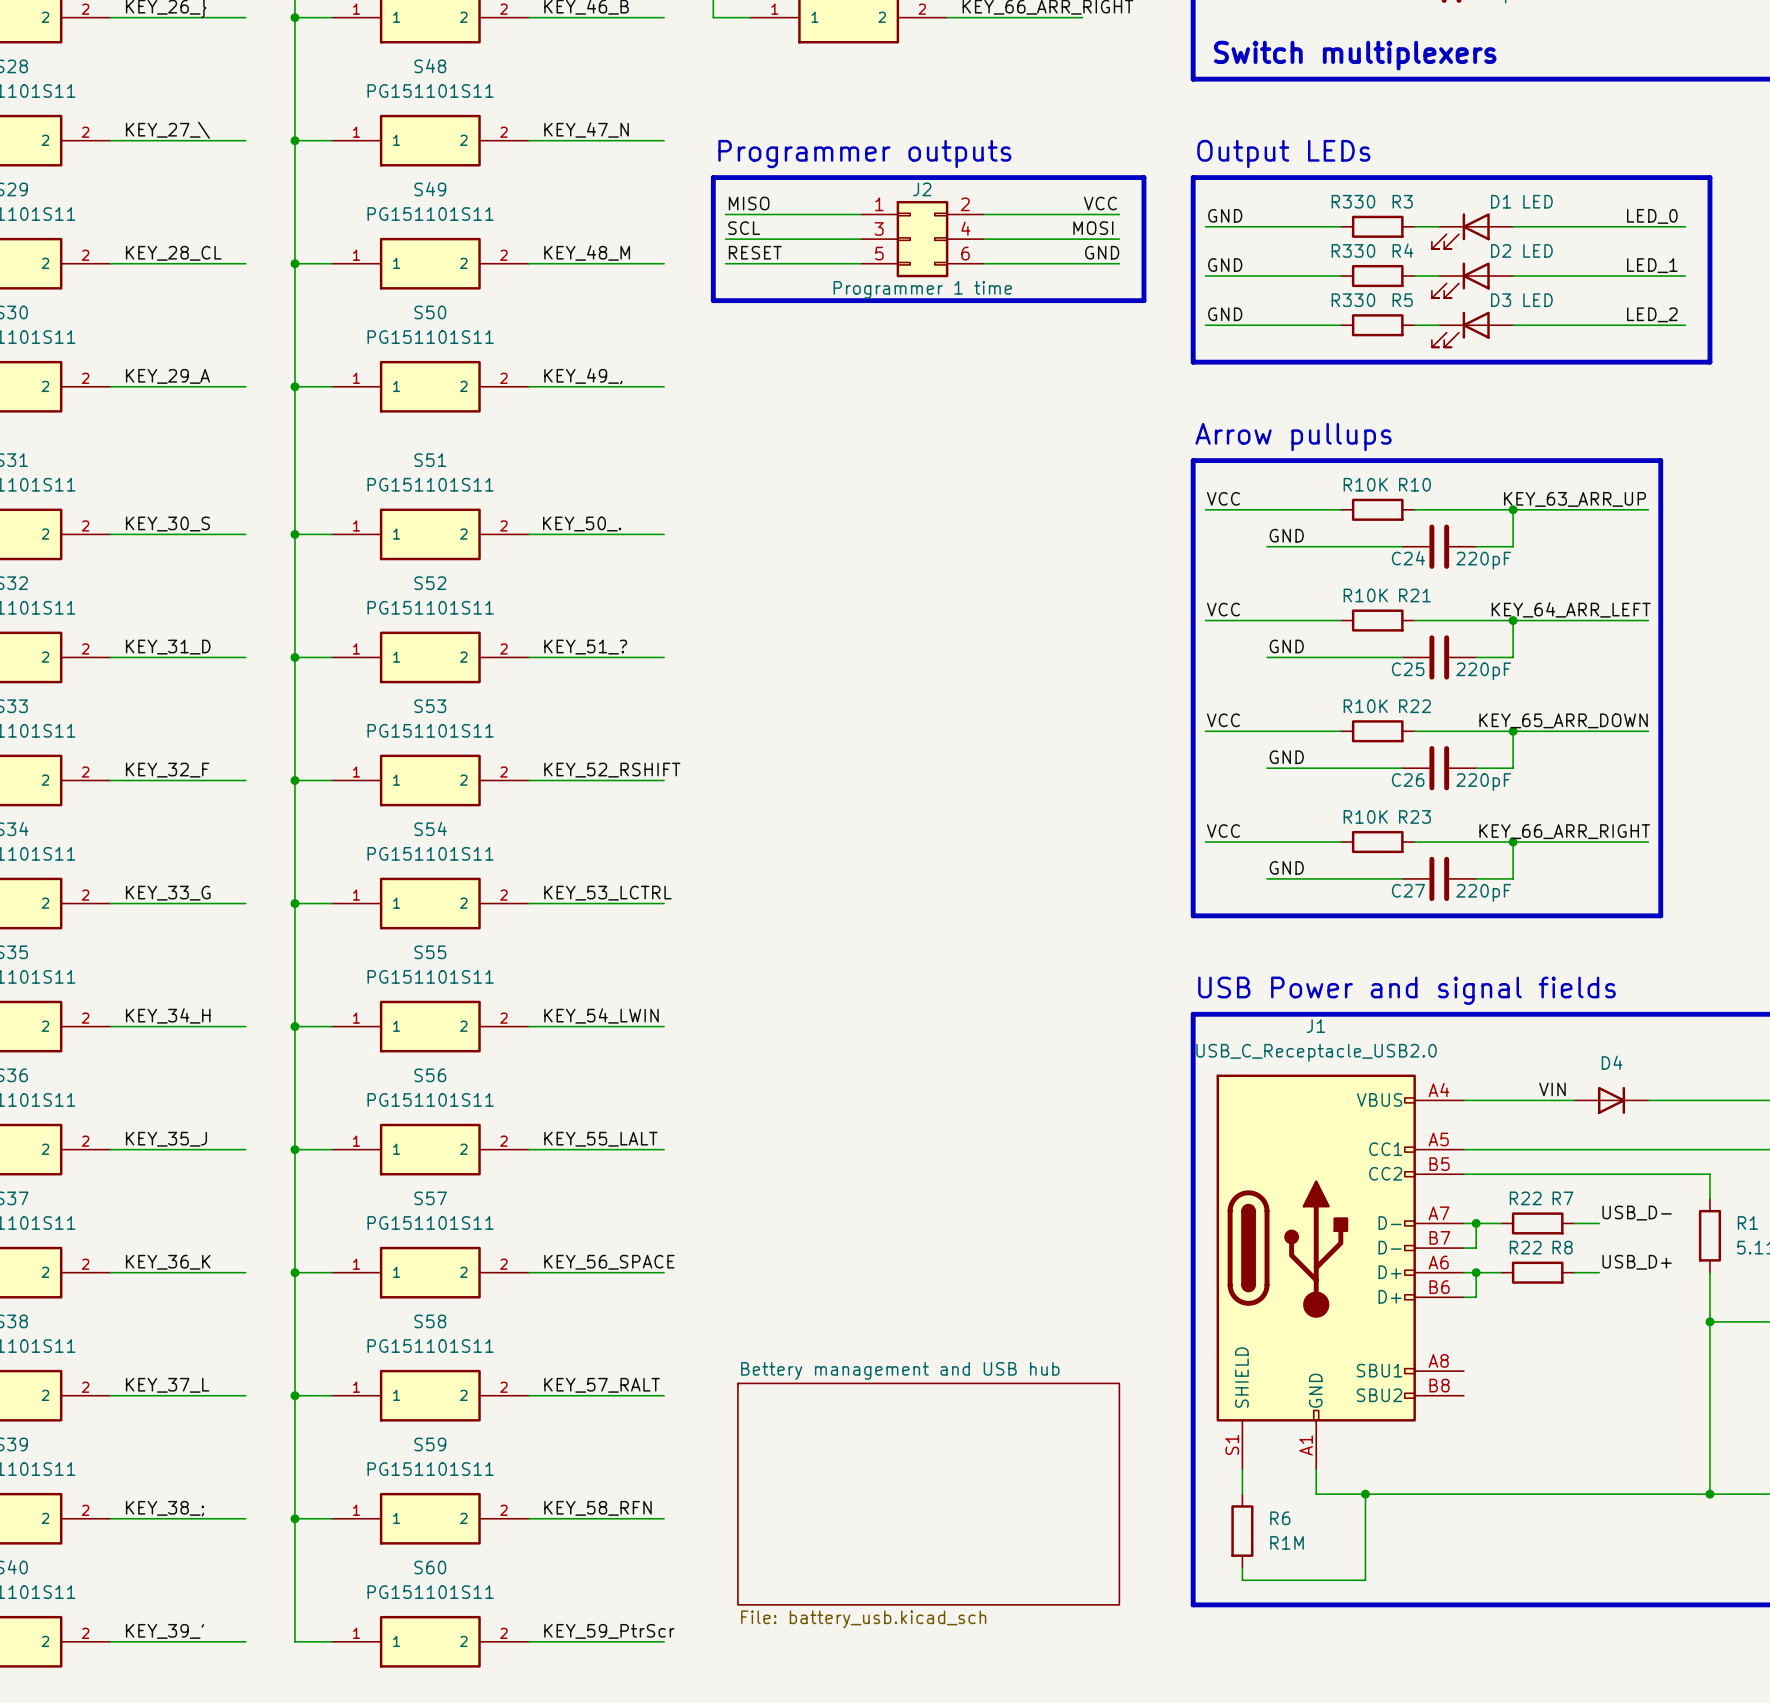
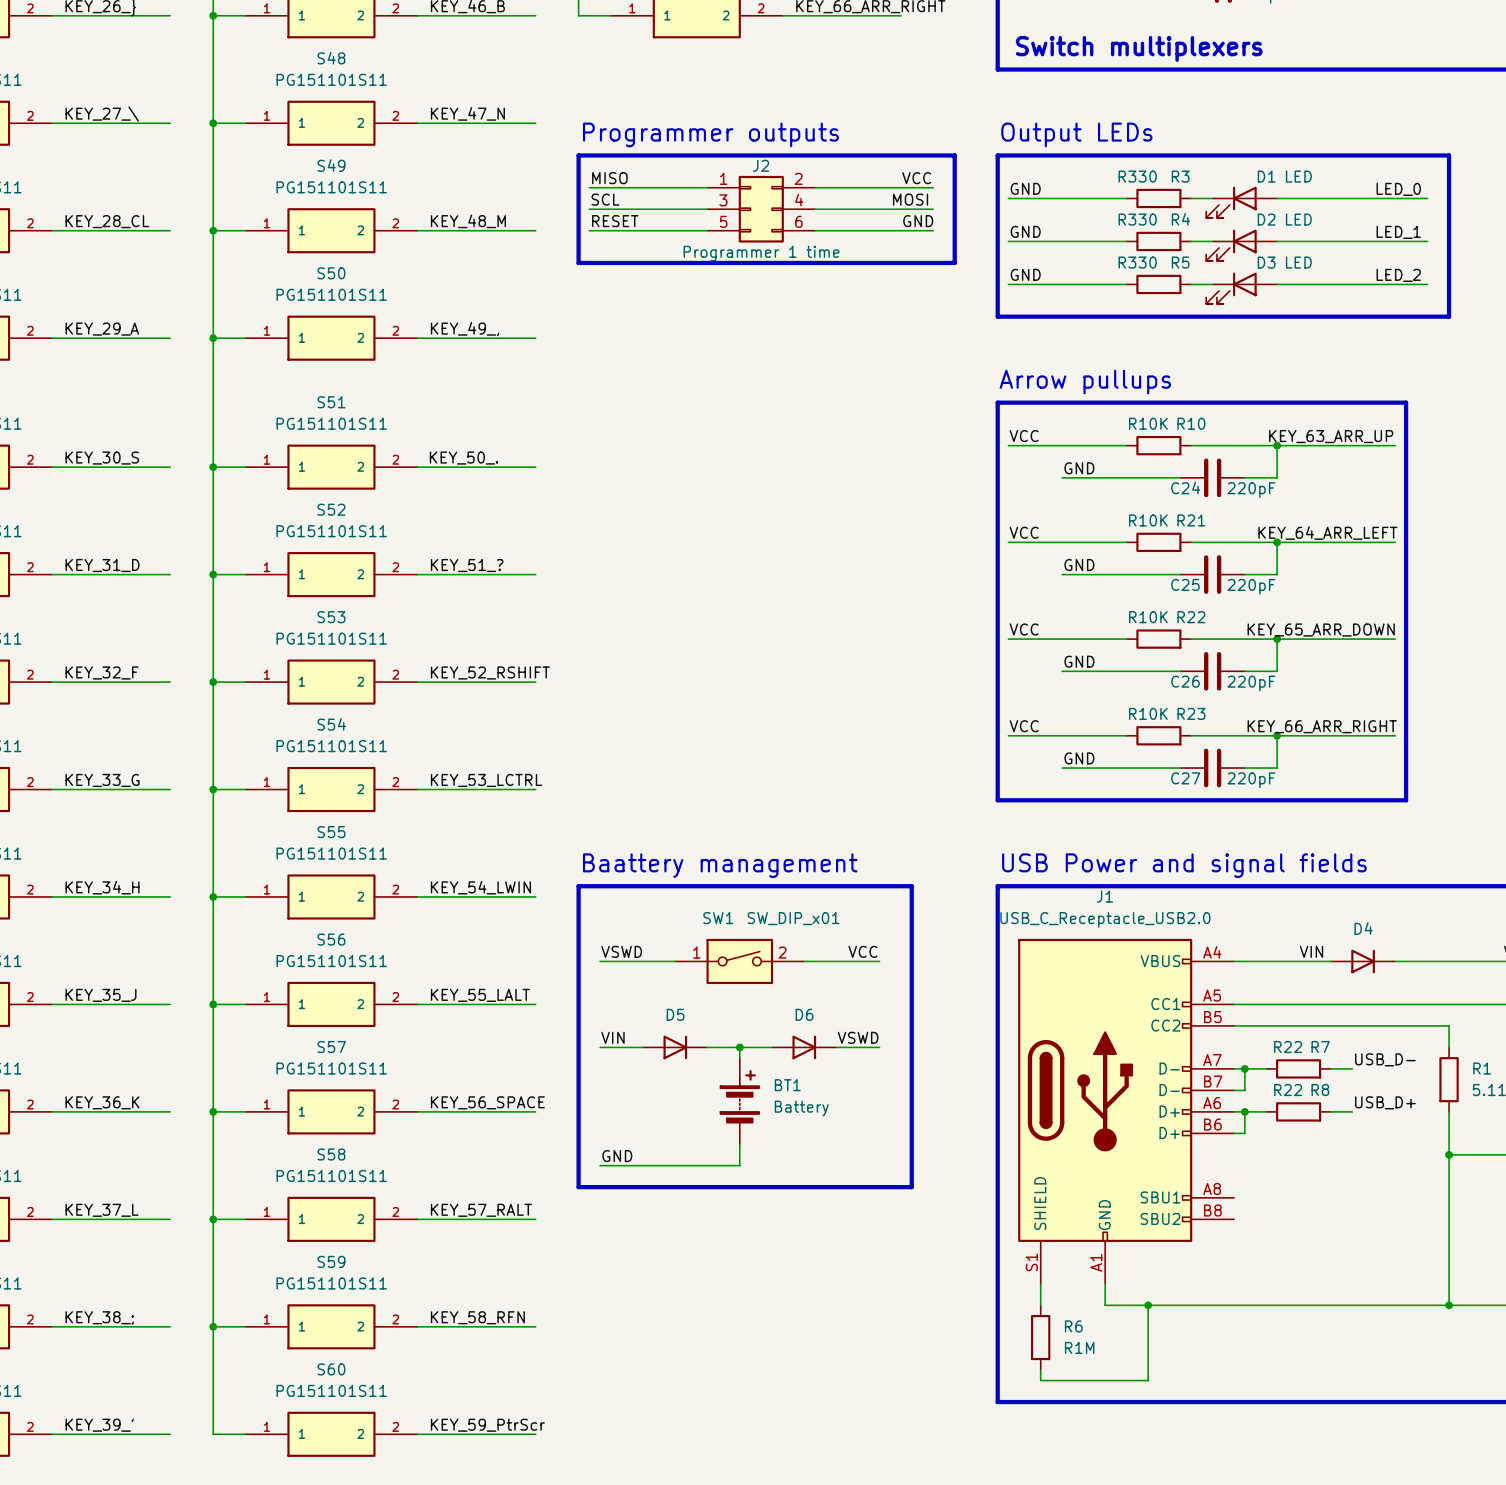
text: none -> Baattery management (720, 865)
line: none -> (578, 886) (911, 886) (911, 1187) (578, 1187) (578, 886)
label: none -> VSWD (621, 951)
label: none -> VCC (862, 951)
wire: none -> (600, 961) (675, 961)
SW1: none -> SW_DIP_x01 (739, 961)
wire: none -> (804, 961) (879, 961)
label: none -> VIN (612, 1037)
label: none -> VSWD (858, 1037)
wire: none -> (600, 1047) (643, 1047)
D5: none -> (675, 1047)
wire: none -> (707, 1047) (772, 1047)
wire: none -> (739, 1047) (739, 1058)
junction: none -> (739, 1047)
D6: none -> (804, 1047)
wire: none -> (836, 1047) (879, 1047)
BT1: none -> Battery (739, 1101)
wire: none -> (739, 1144) (739, 1165) (600, 1165)
label: none -> GND (617, 1156)
sheet Bettery management and USB hub: File: battery_usb.kicad_sch (928, 1494) -> none

